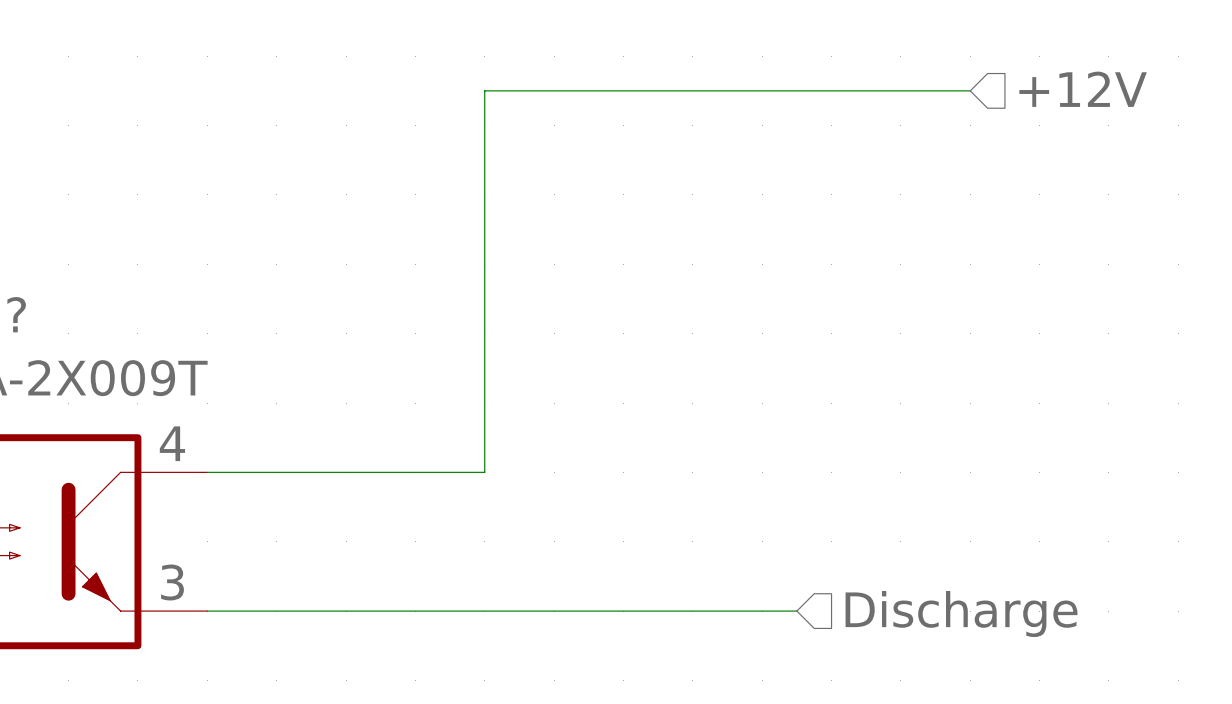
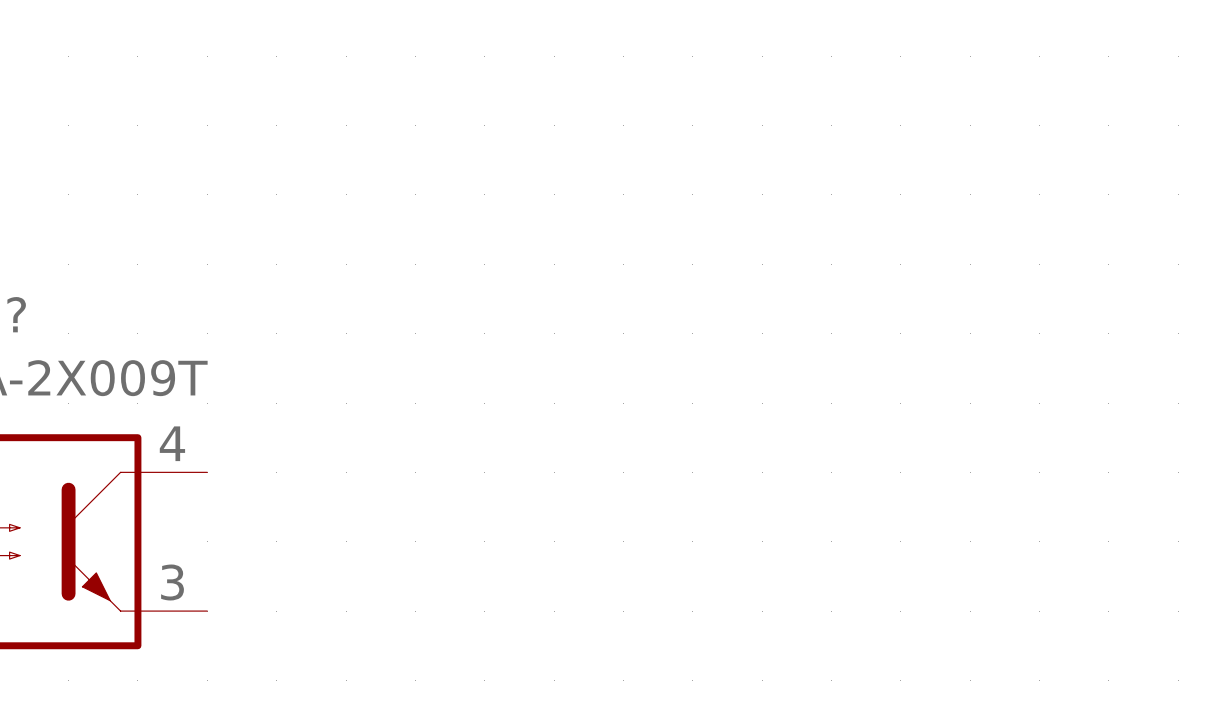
hierarchical label: +12V (1083, 89) -> none
wire: (970, 90) (484, 90) (484, 472) (207, 472) -> none
wire: (207, 611) (796, 611) -> none
hierarchical label: Discharge (961, 614) -> none

